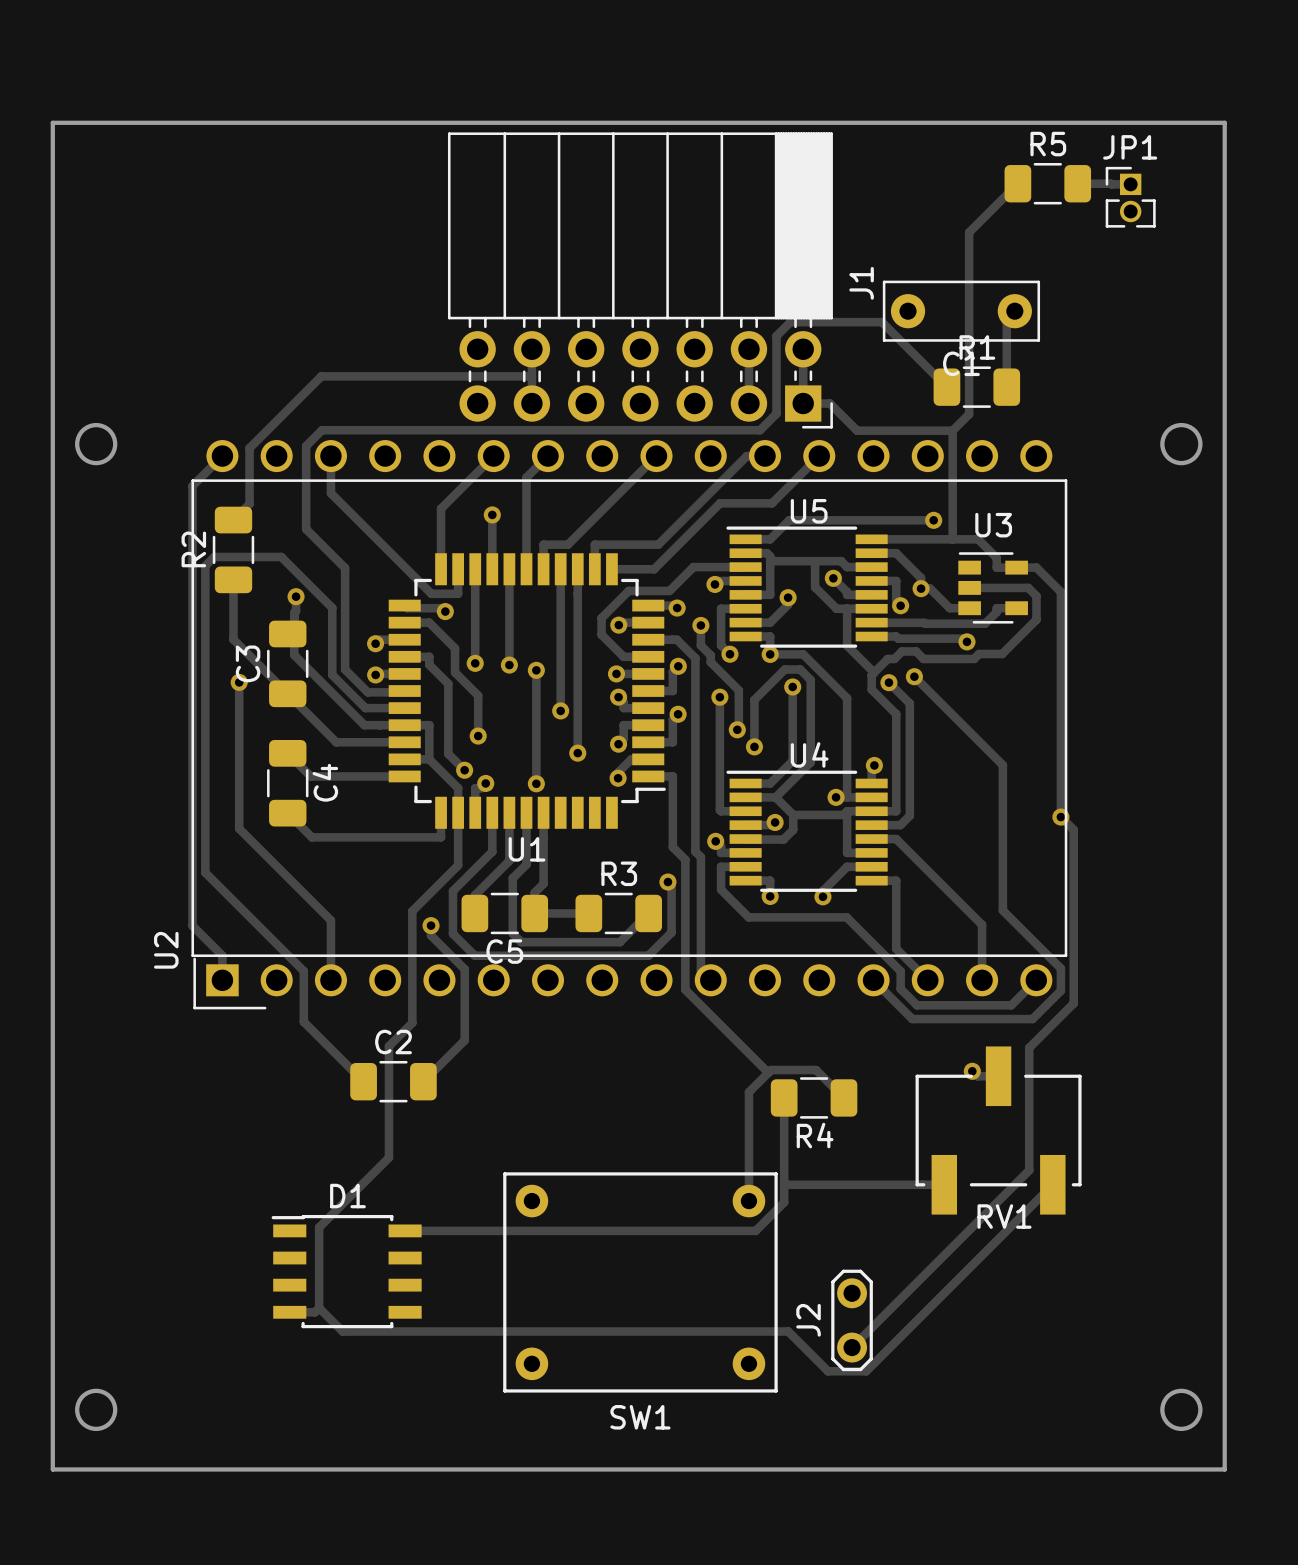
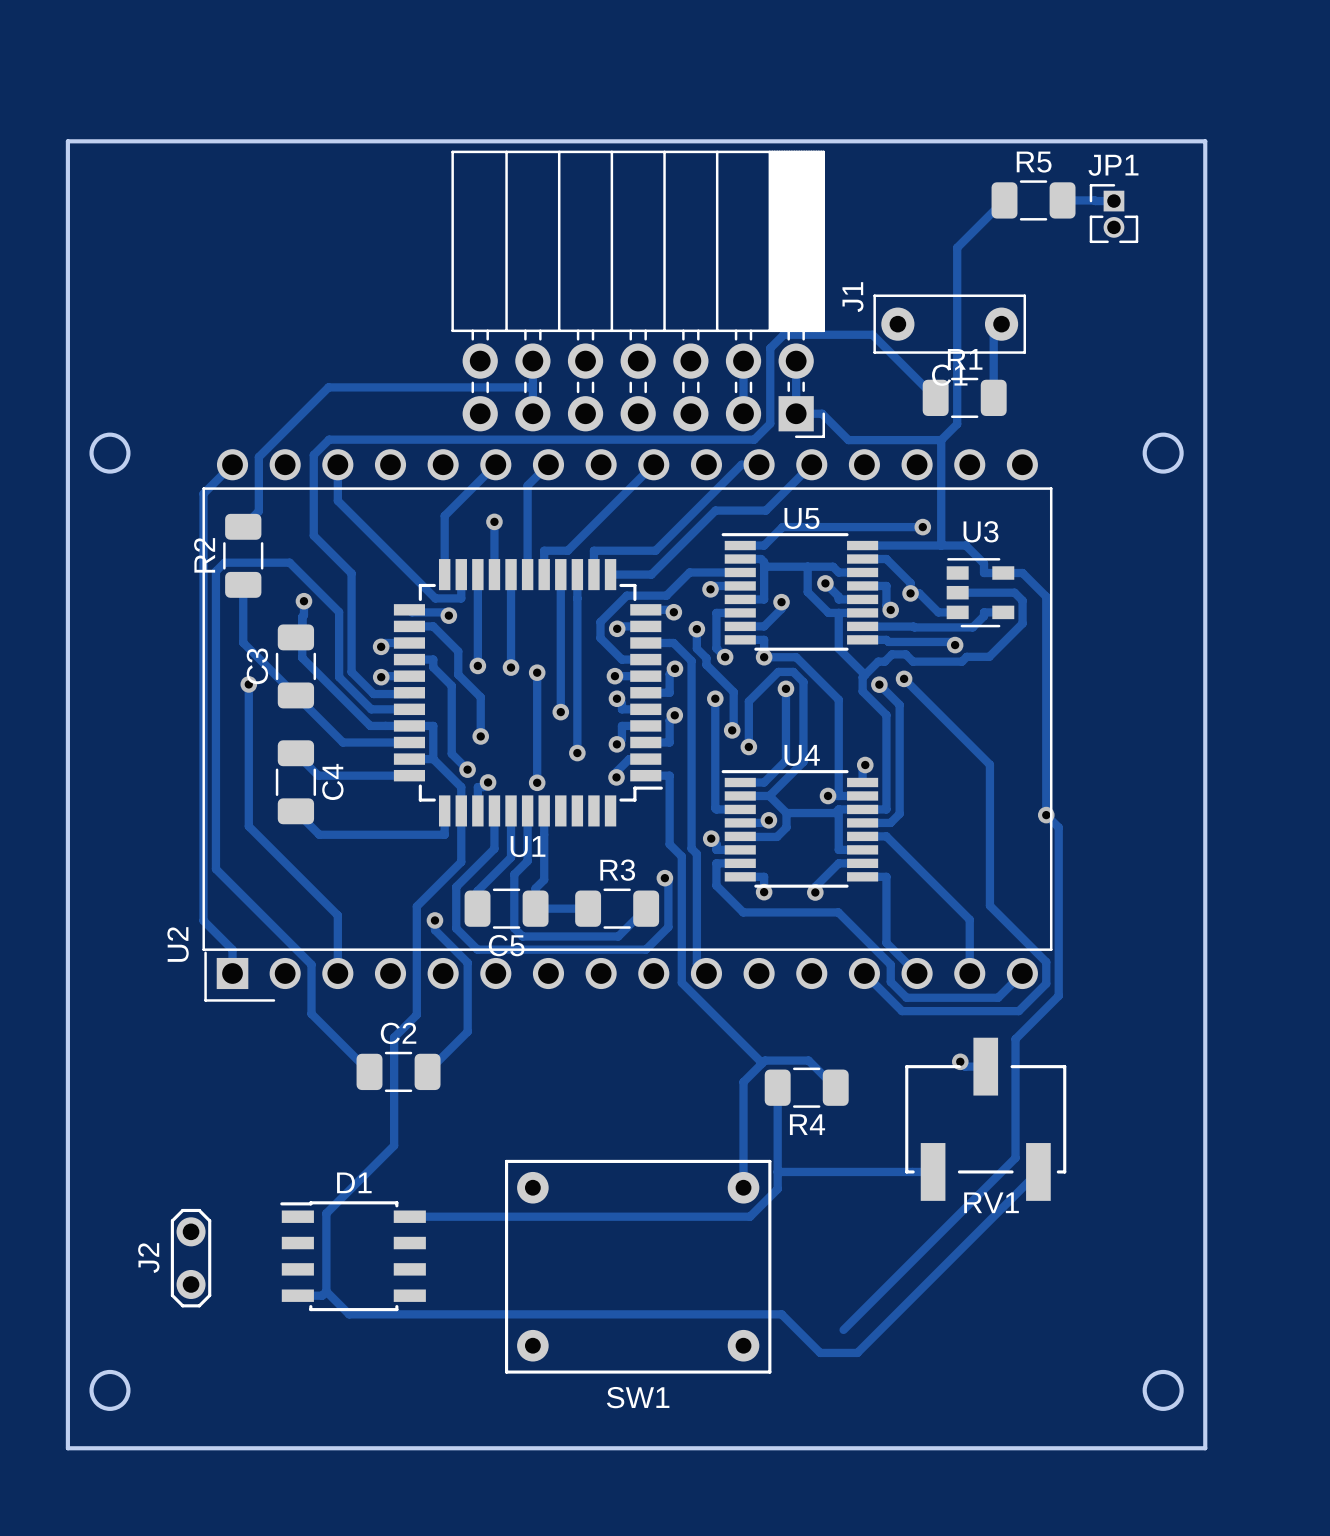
J2 position: (852, 1320) -> (191, 1258)

